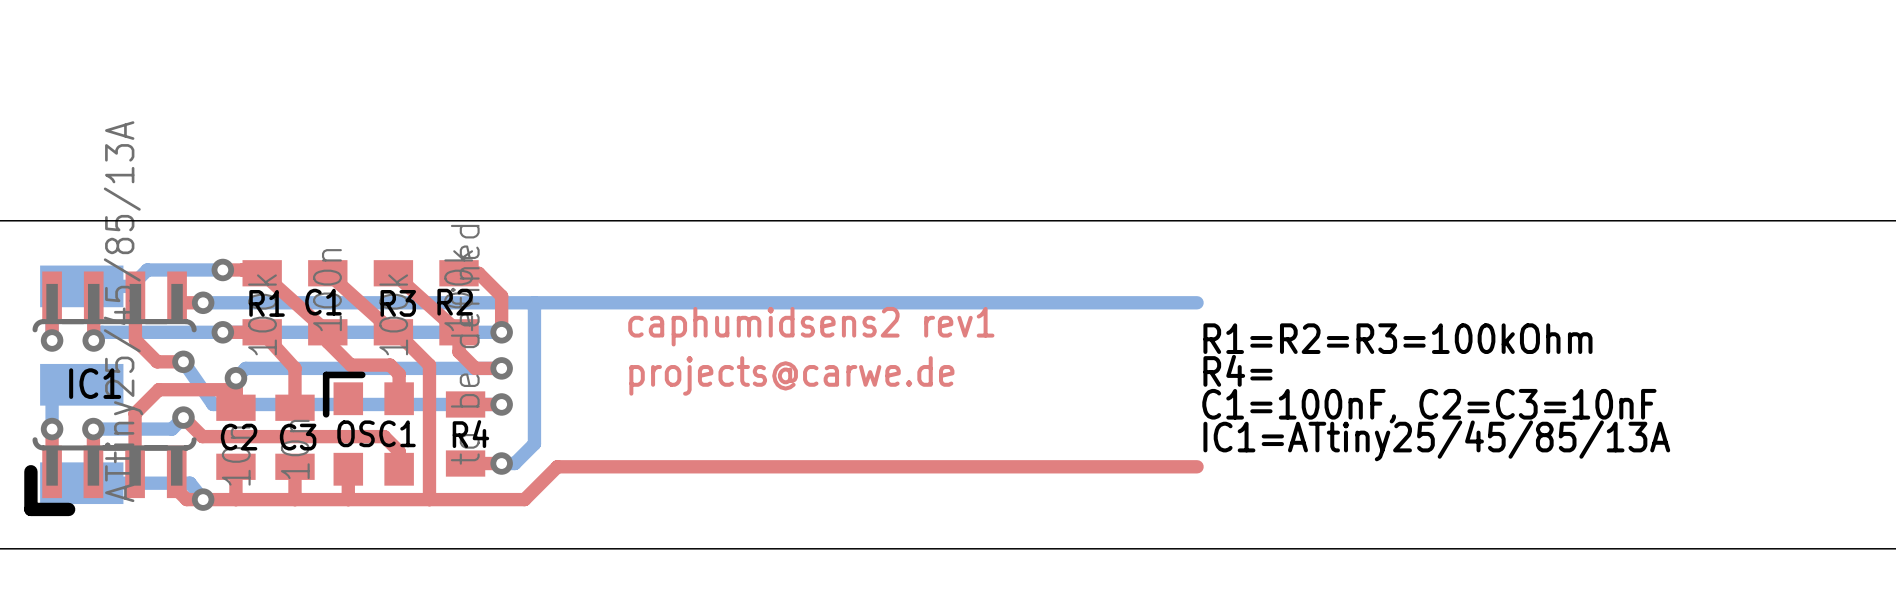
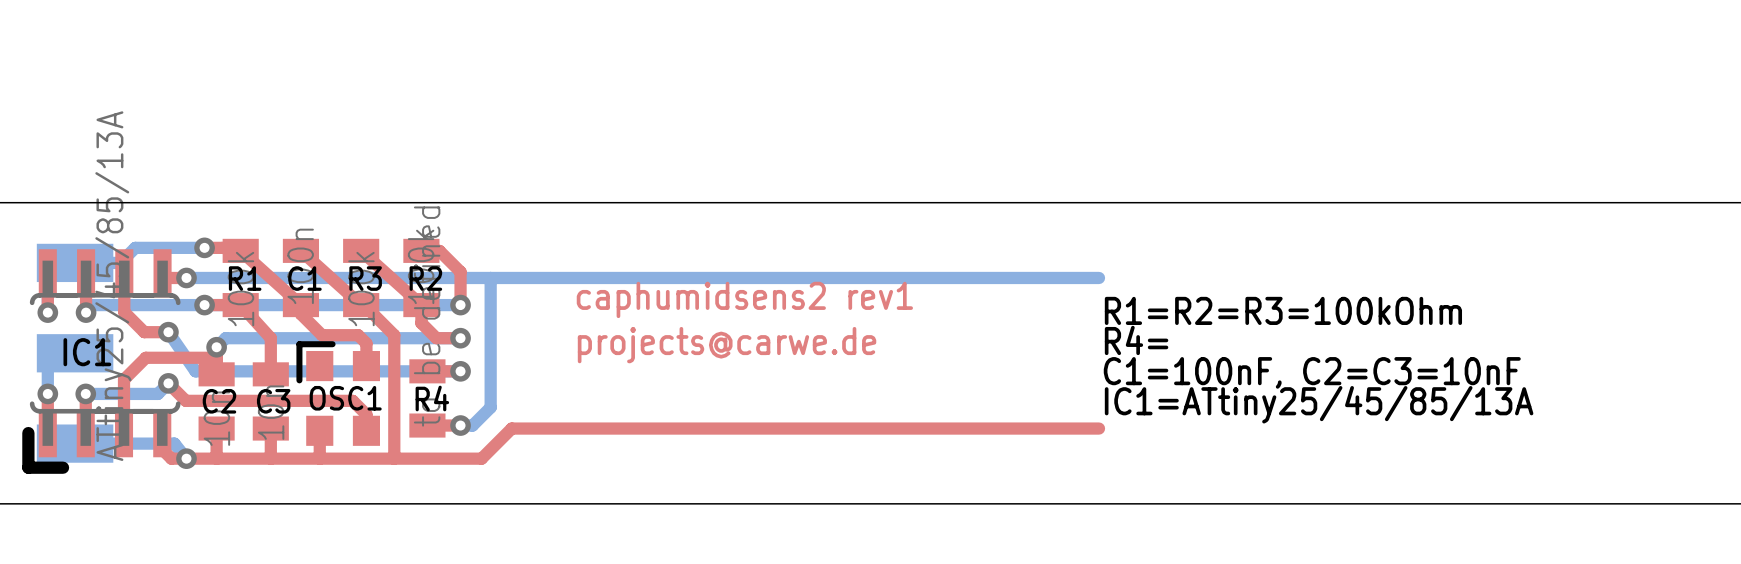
C1 name position: C1 (323, 302) -> C1 (304, 278)
R2 name position: R2 (455, 302) -> R2 (425, 278)

